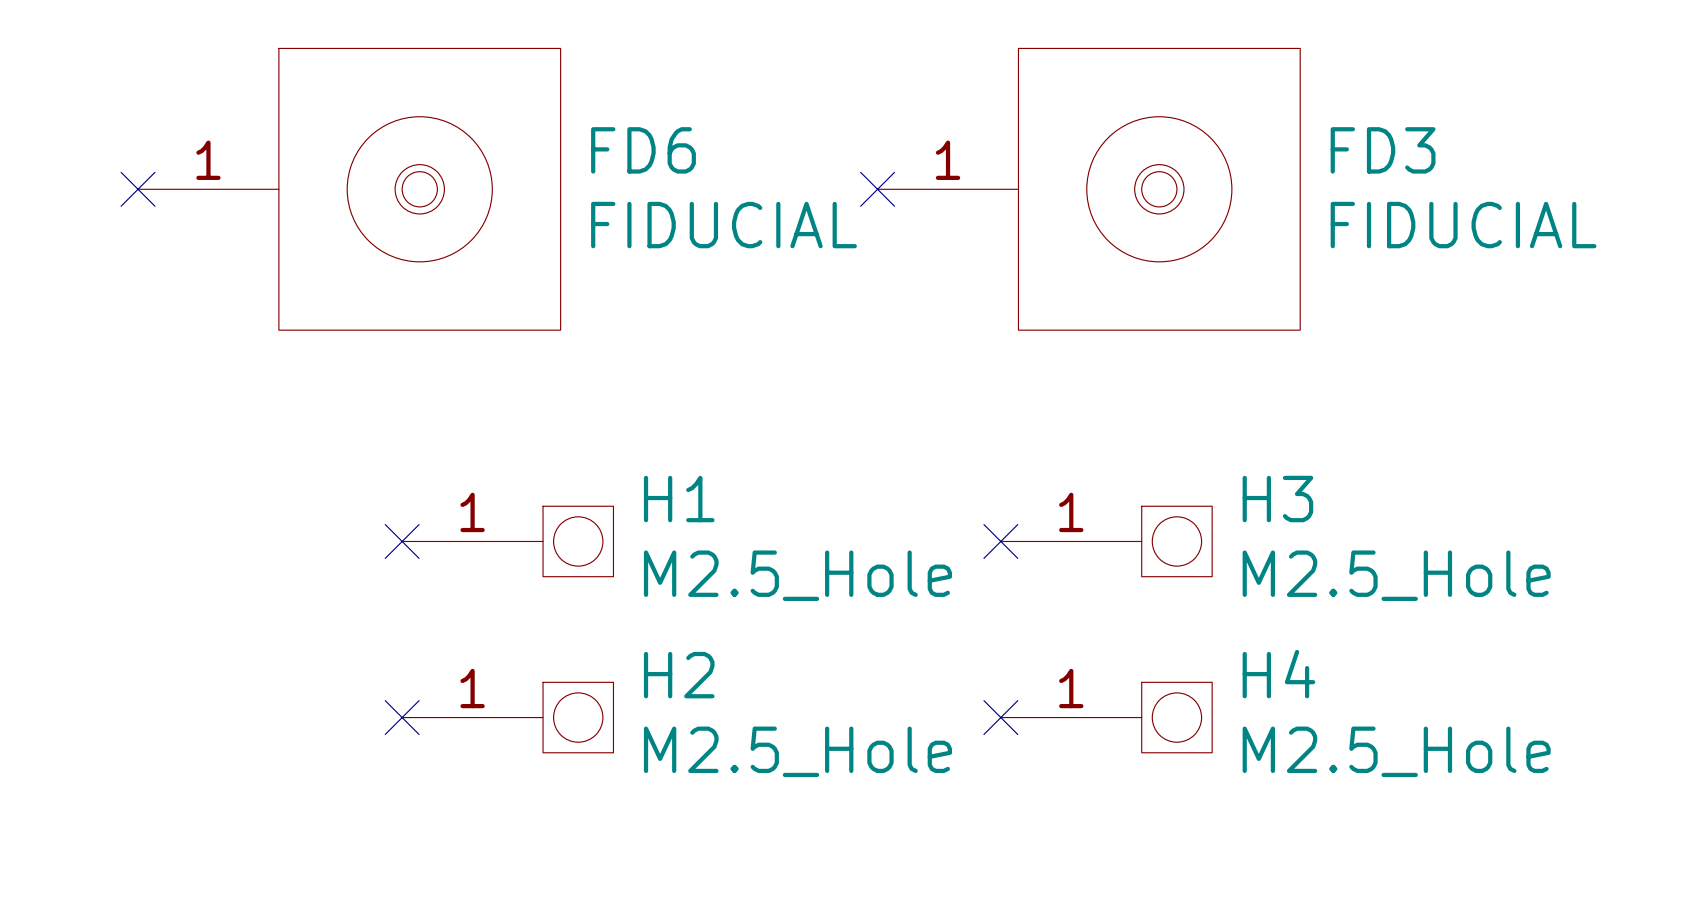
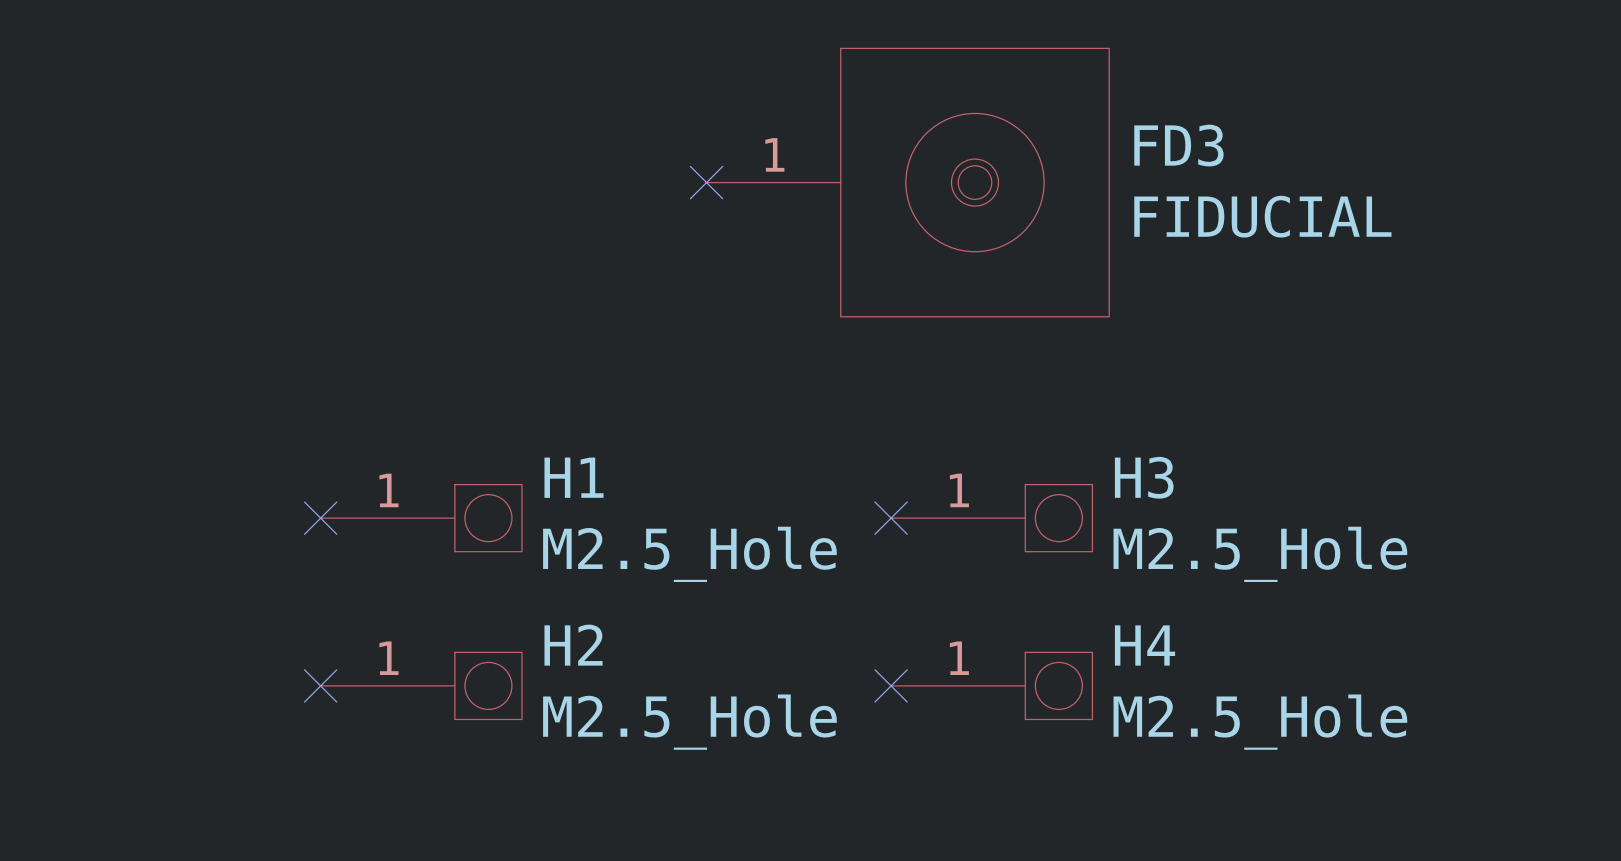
no-connect mark: (138, 189) -> none
FD6: FIDUCIAL (349, 189) -> none
no-connect mark position: (877, 189) -> (706, 182)
FD3 position: (1088, 189) -> (907, 182)

